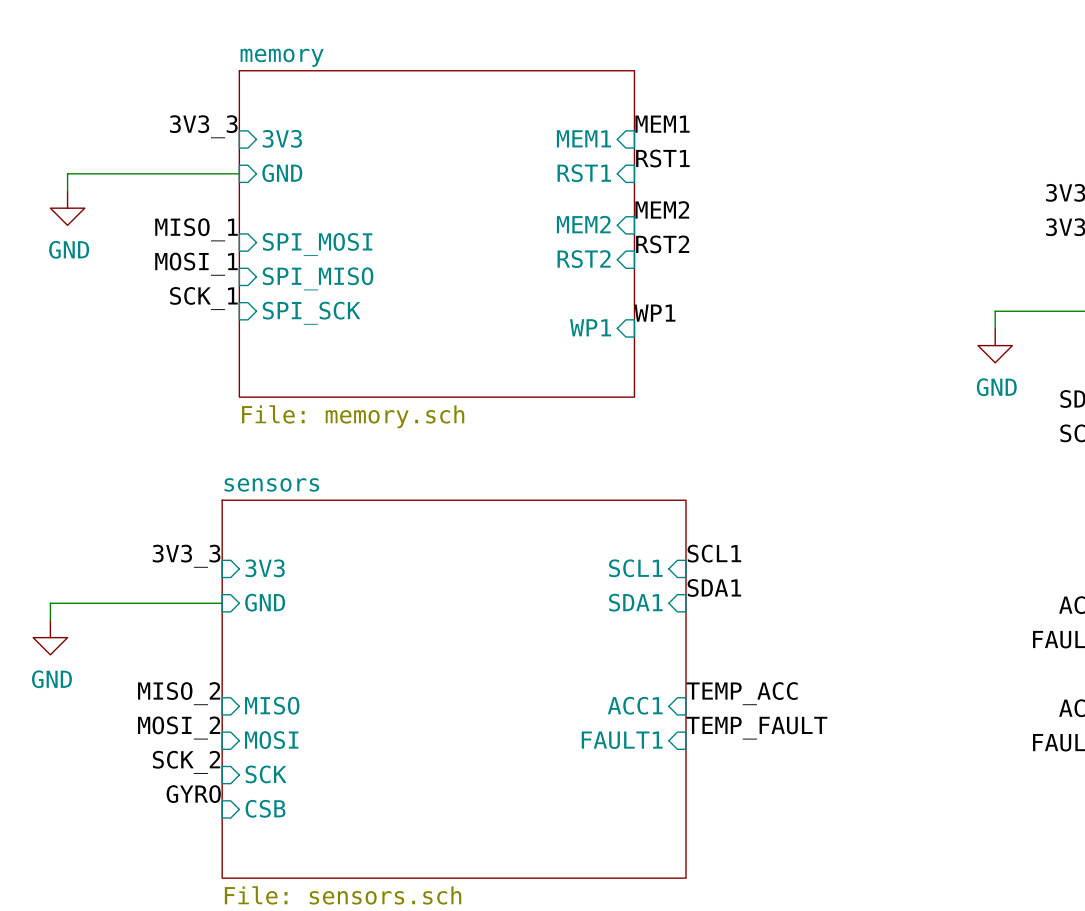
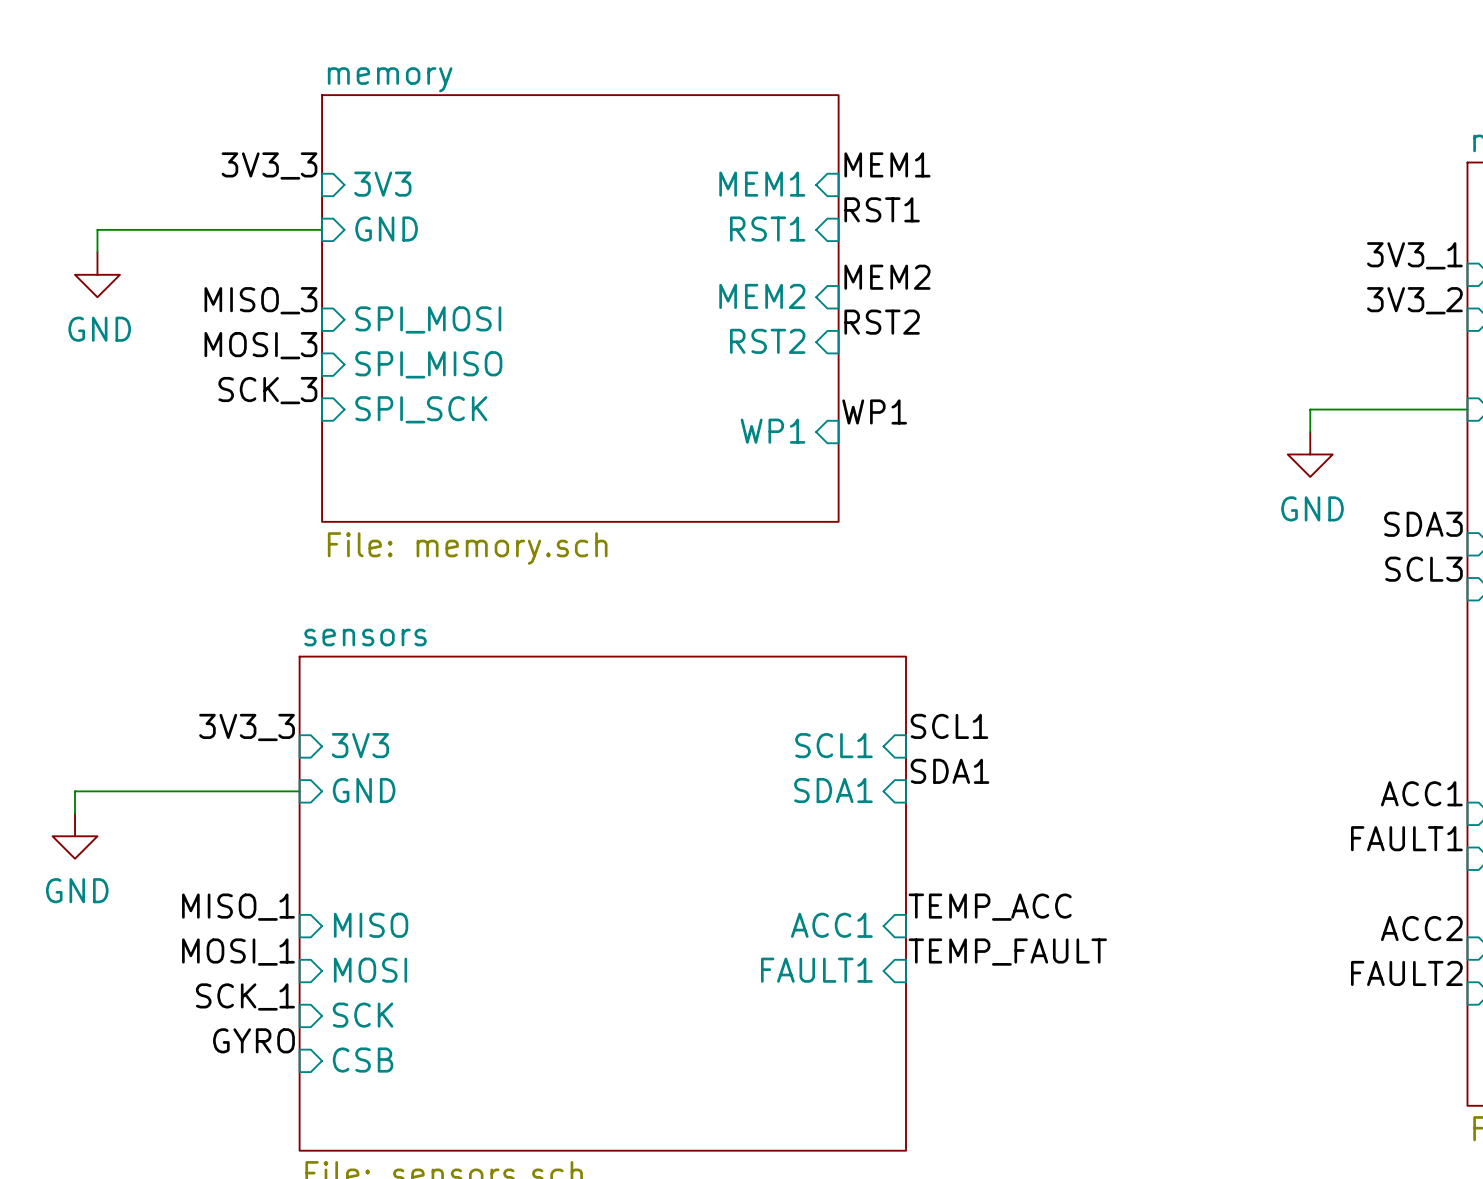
label: MISO_1 (196, 229) -> MISO_3 (260, 300)
label: MOSI_1 (196, 264) -> MOSI_3 (260, 345)
label: SCK_1 (203, 298) -> SCK_3 (267, 390)
label: MISO_2 (179, 693) -> MISO_1 (238, 907)
label: MOSI_2 (179, 728) -> MOSI_1 (238, 952)
label: SCK_2 (186, 762) -> SCK_1 (245, 996)

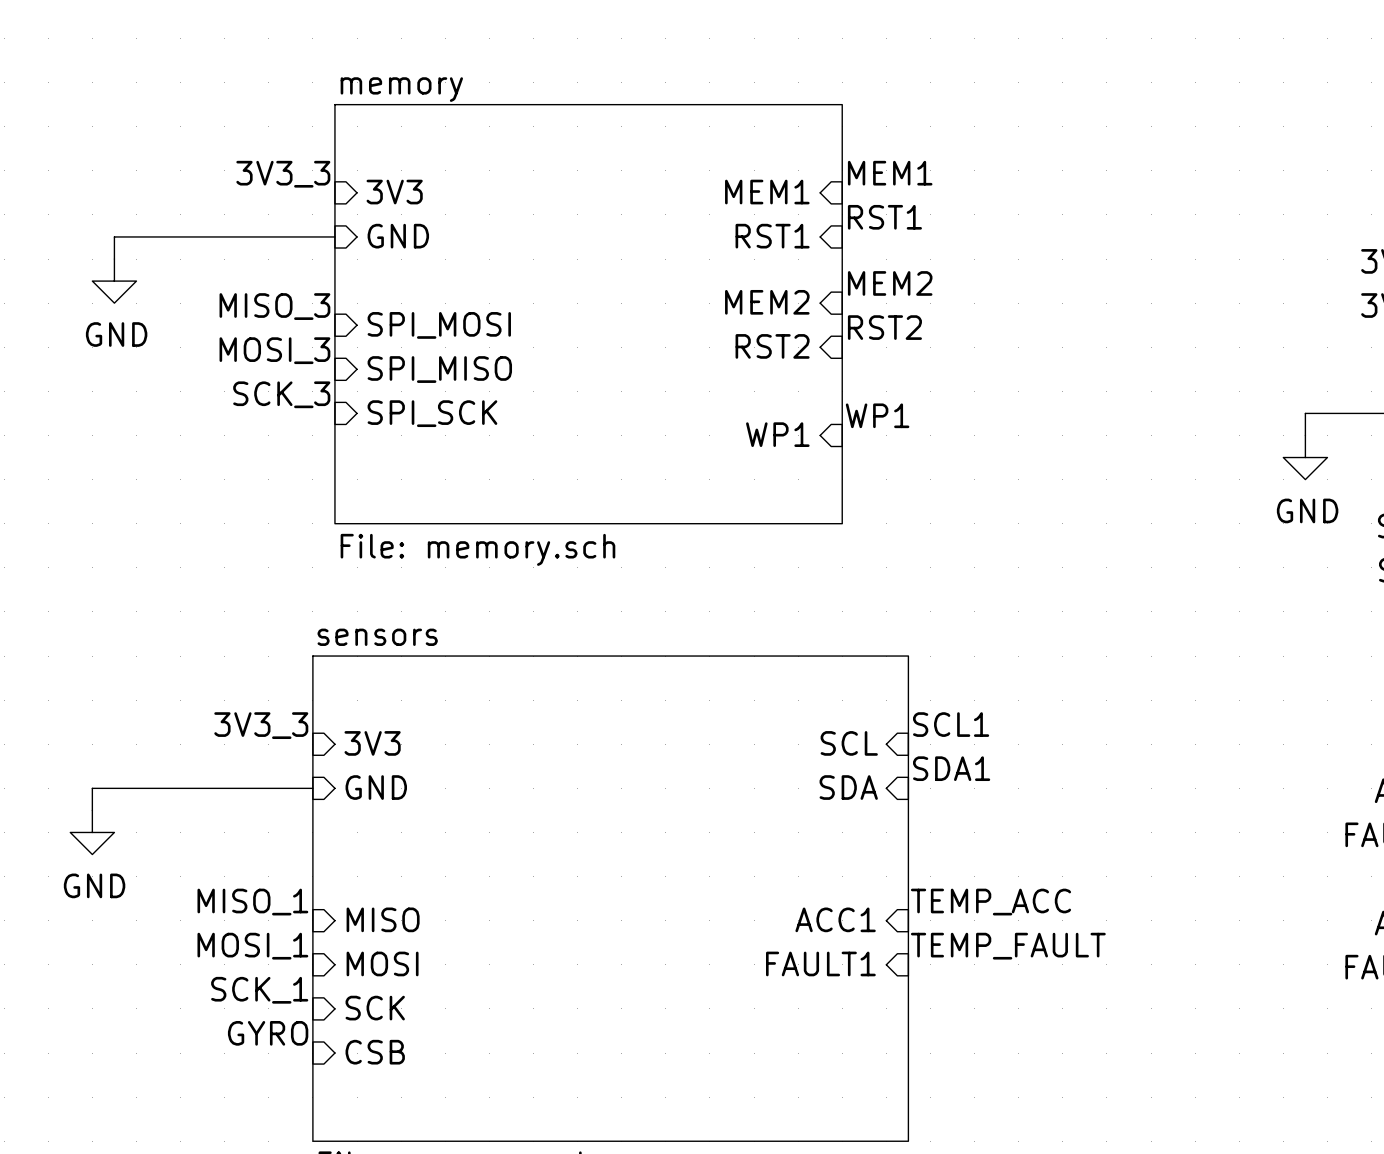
sheet pin: SCL1 (833, 745) -> SCL (849, 743)
sheet pin: SDA1 (833, 790) -> SDA (848, 787)

